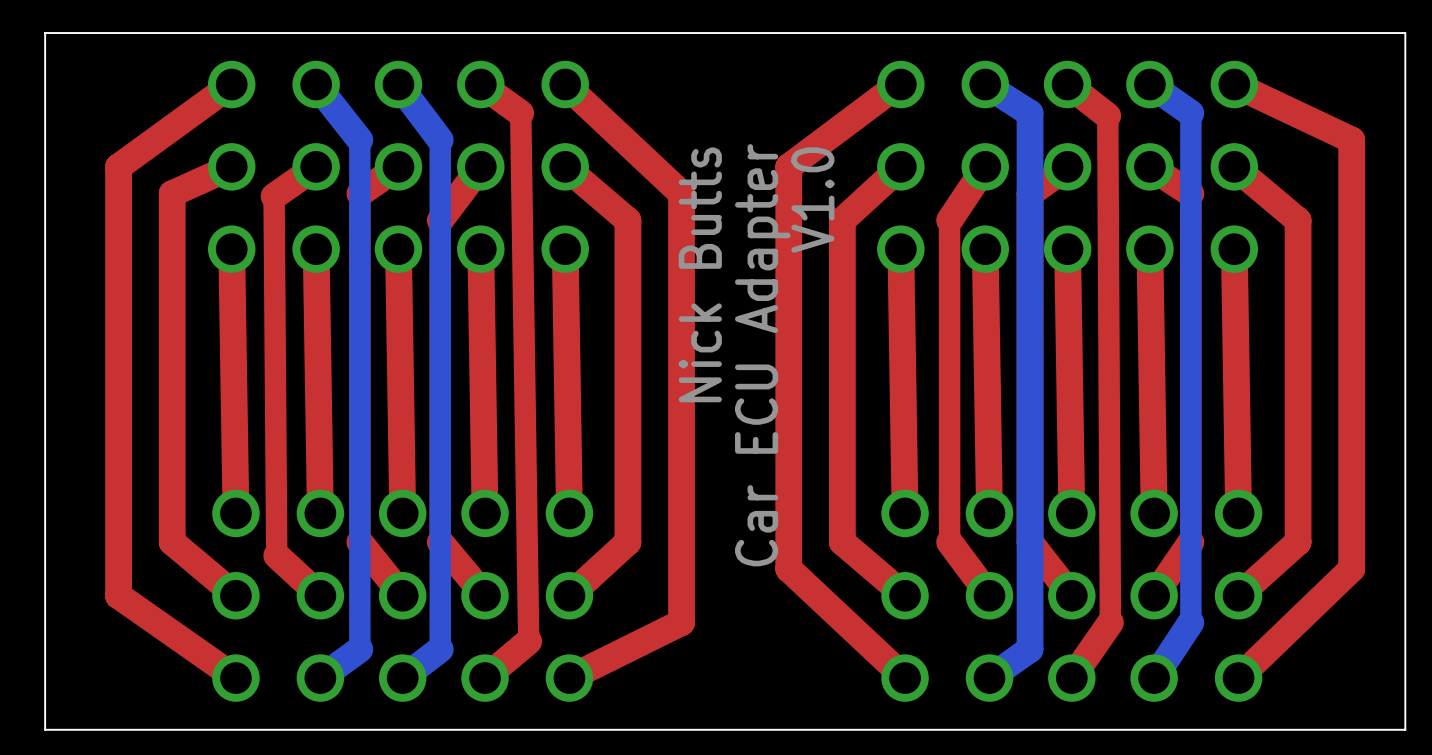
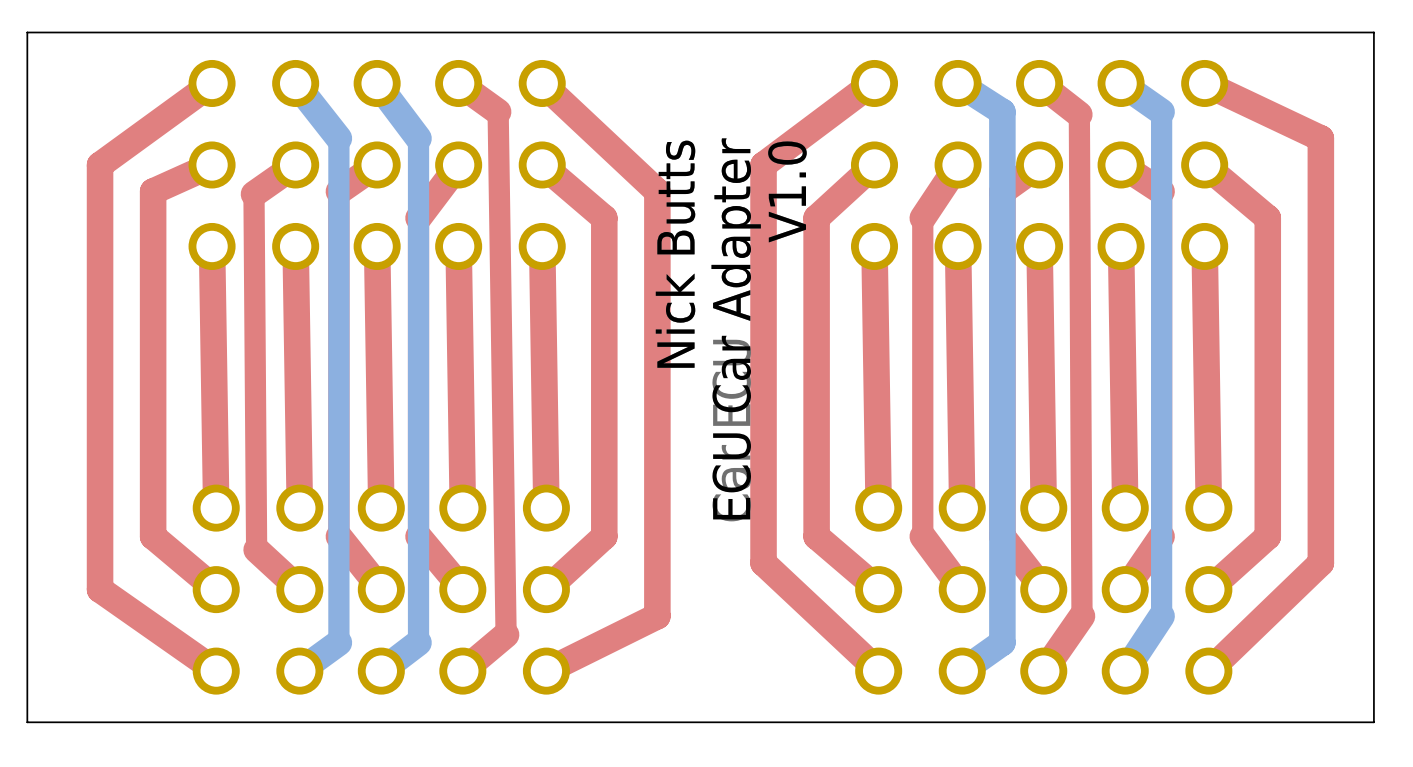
text: none -> V1.0 (787, 191)
text: none -> Nick Butts (675, 254)
text: none -> ECU Car Adapter (736, 328)

